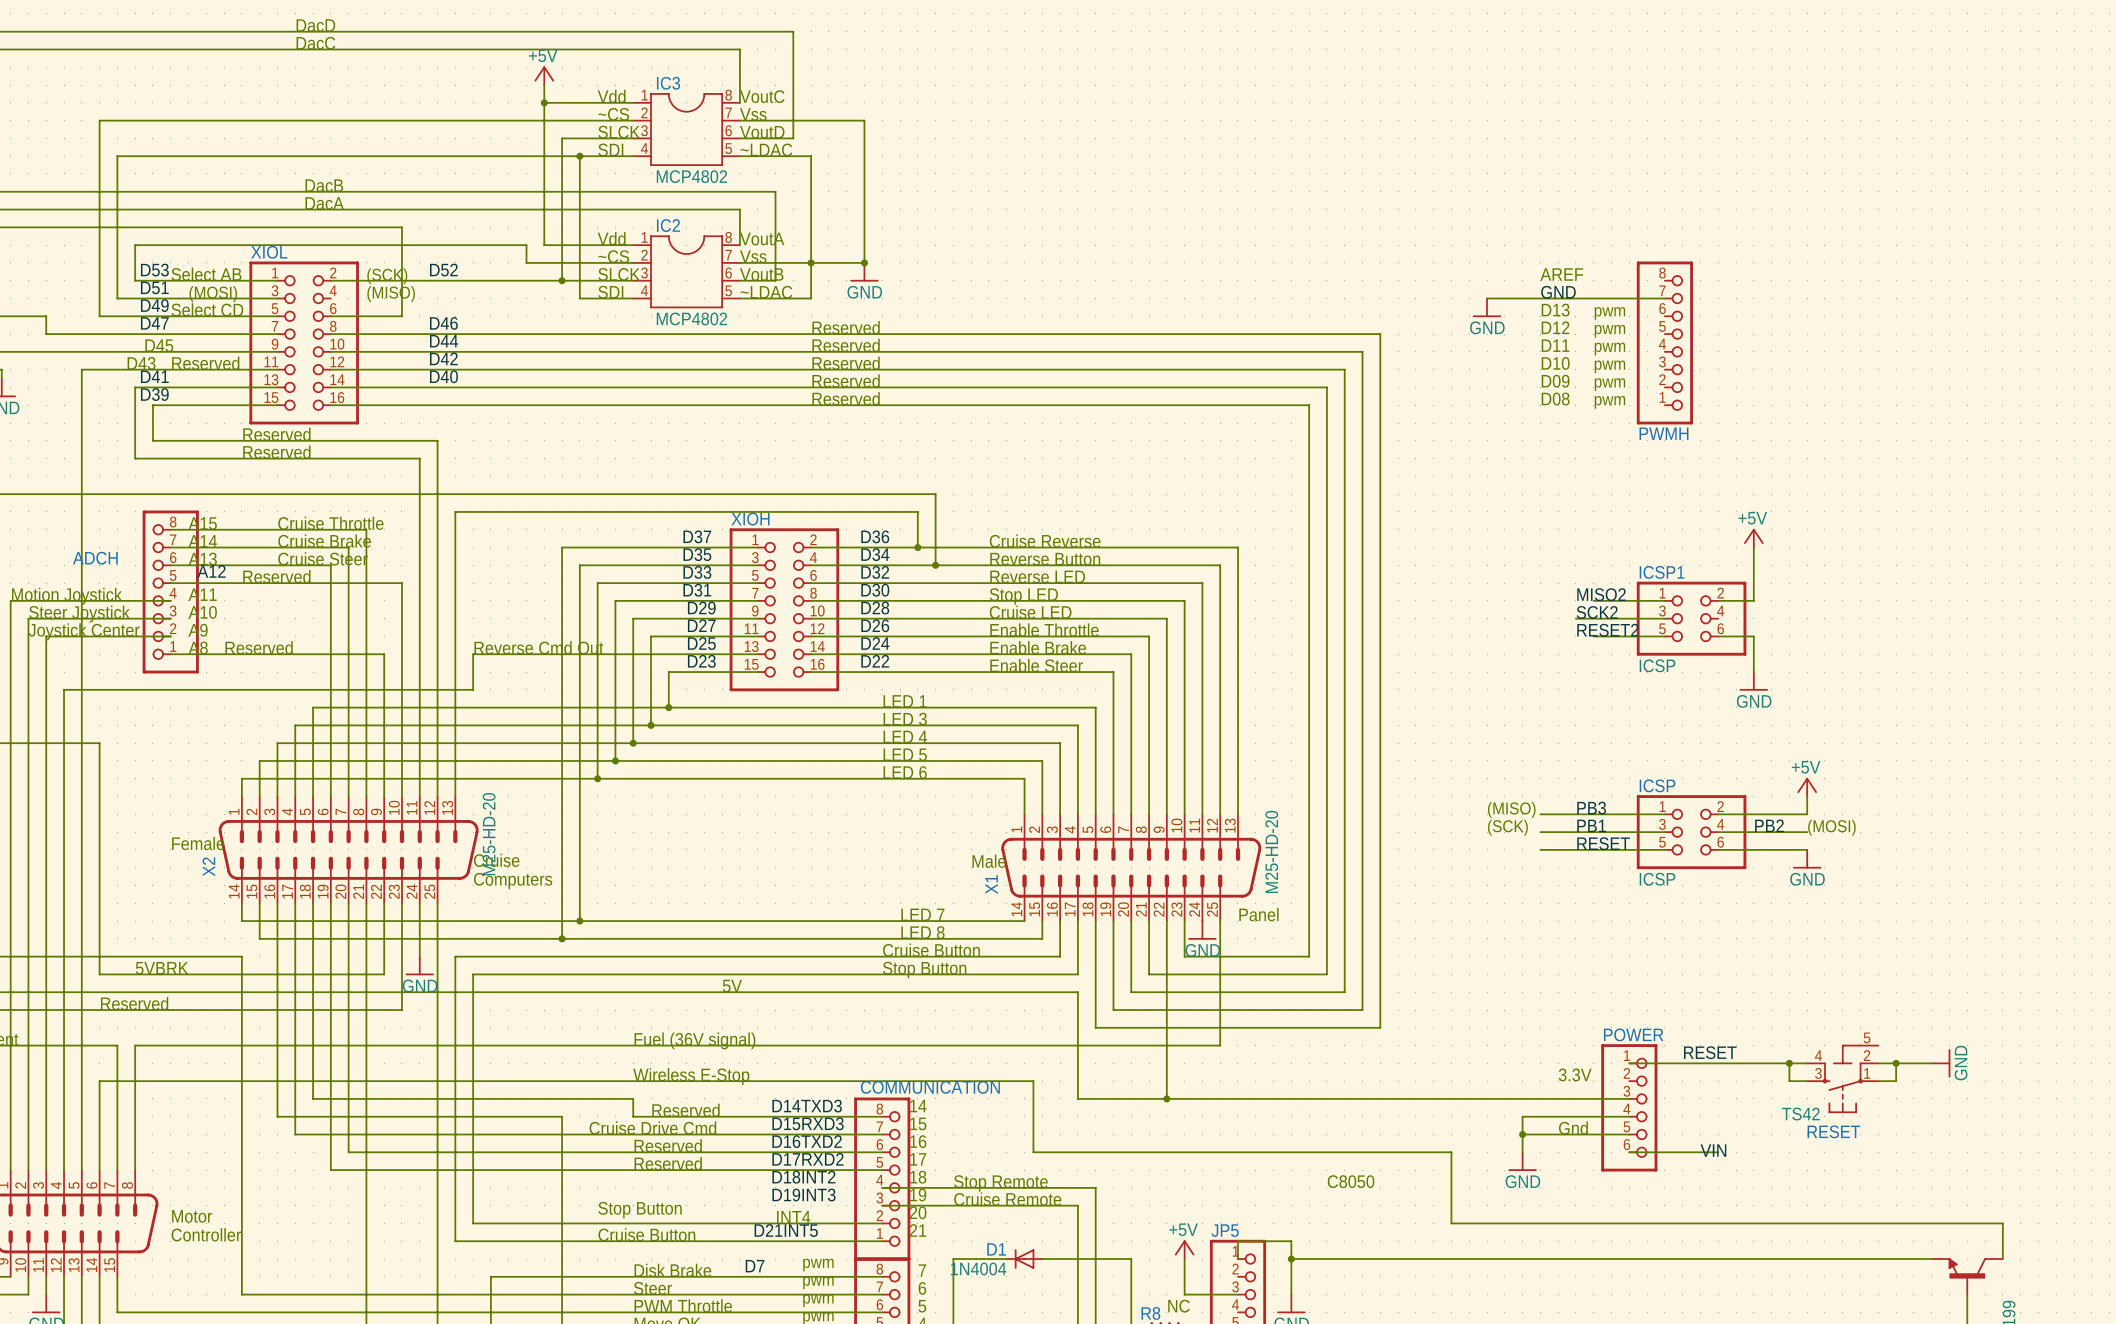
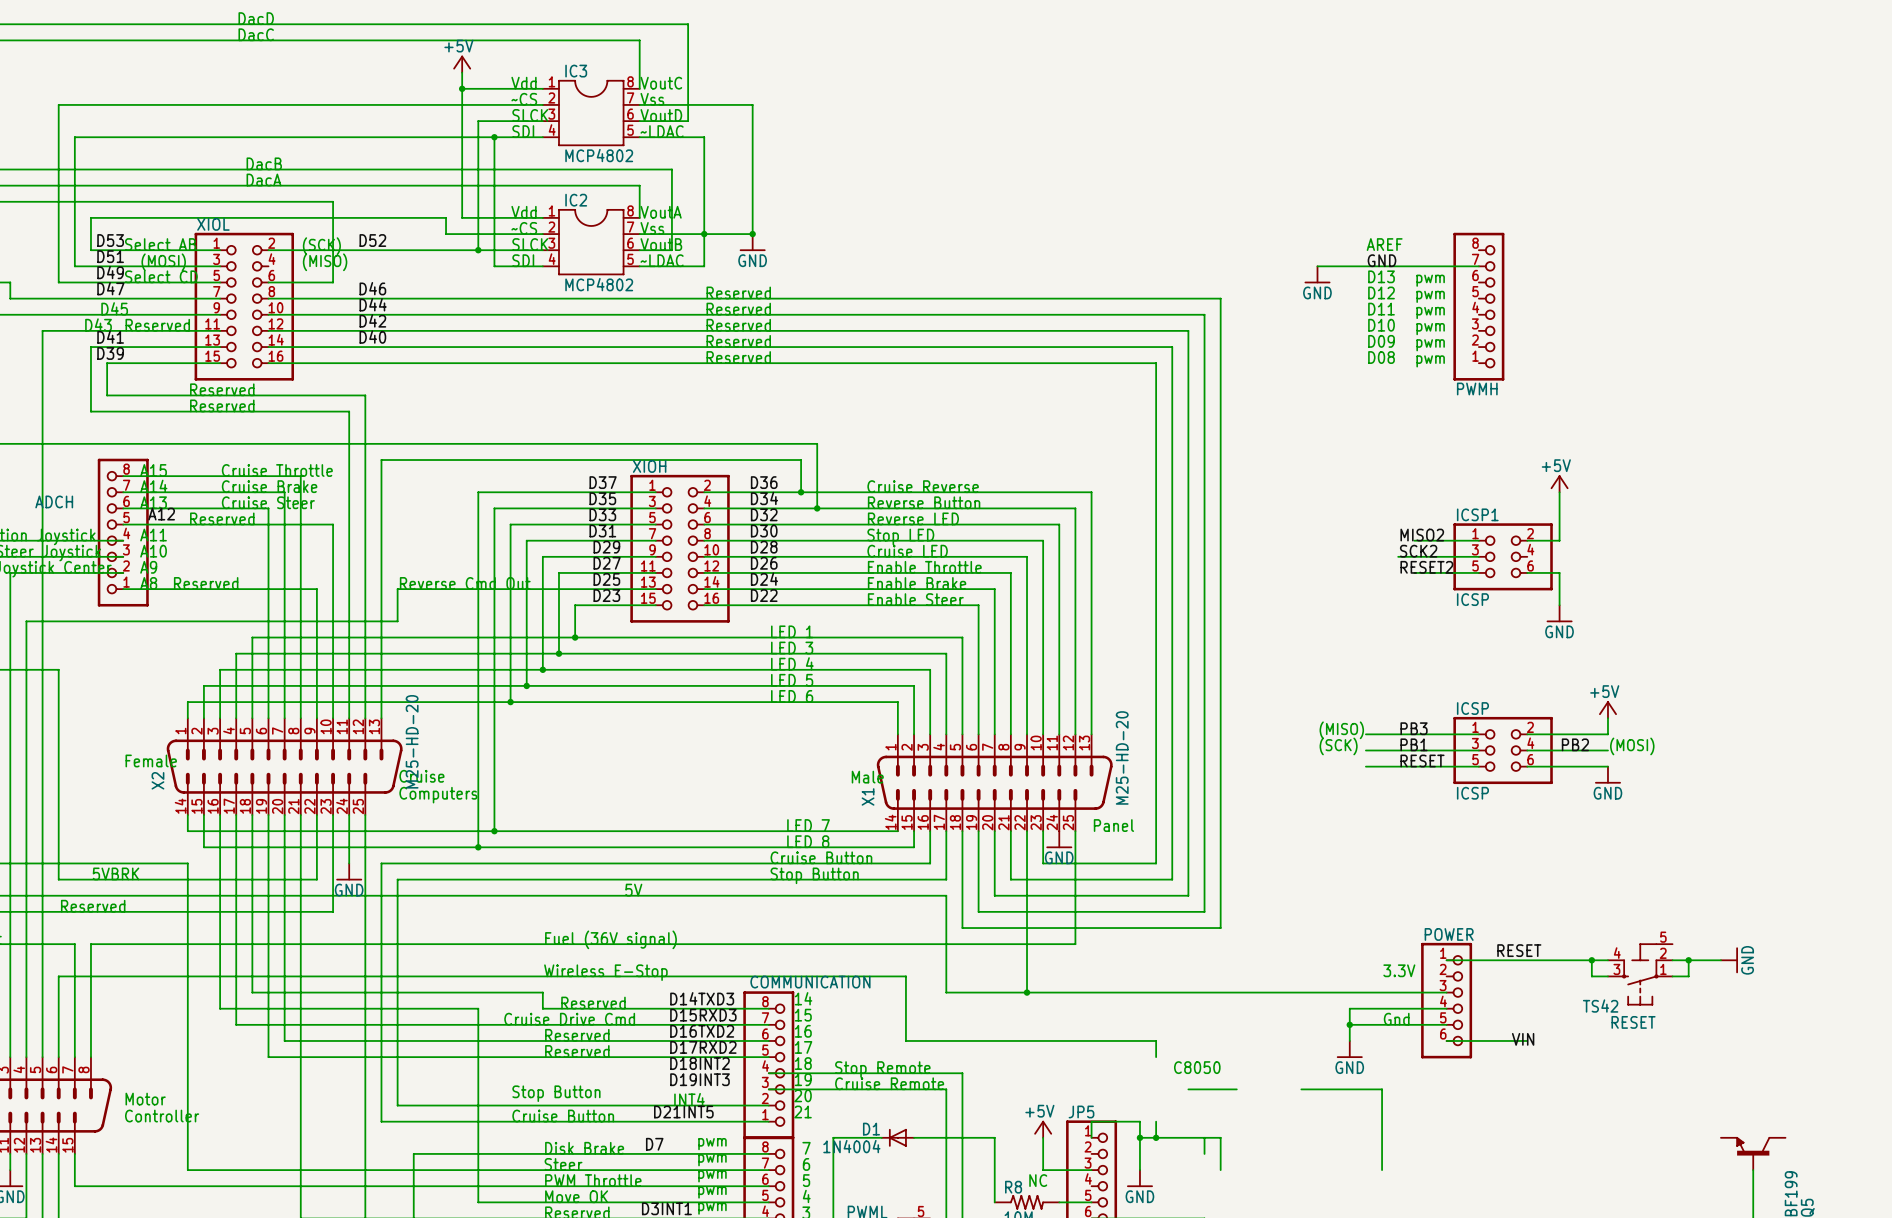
wire: (1309, 1152) (1451, 1152) (1451, 1223) (2002, 1223) (2002, 1259) -> (1156, 1040) (1156, 1057)
wire: none -> (1188, 1089) (1236, 1089)
wire: none -> (1301, 1089) (1382, 1089) (1382, 1170)
wire: none -> (1156, 1121) (1156, 1137)
junction: none -> (1156, 1137)
wire: none -> (1204, 1137) (1204, 1153)
wire: (1380, 1259) (1931, 1259) -> (1220, 1137) (1220, 1170)

